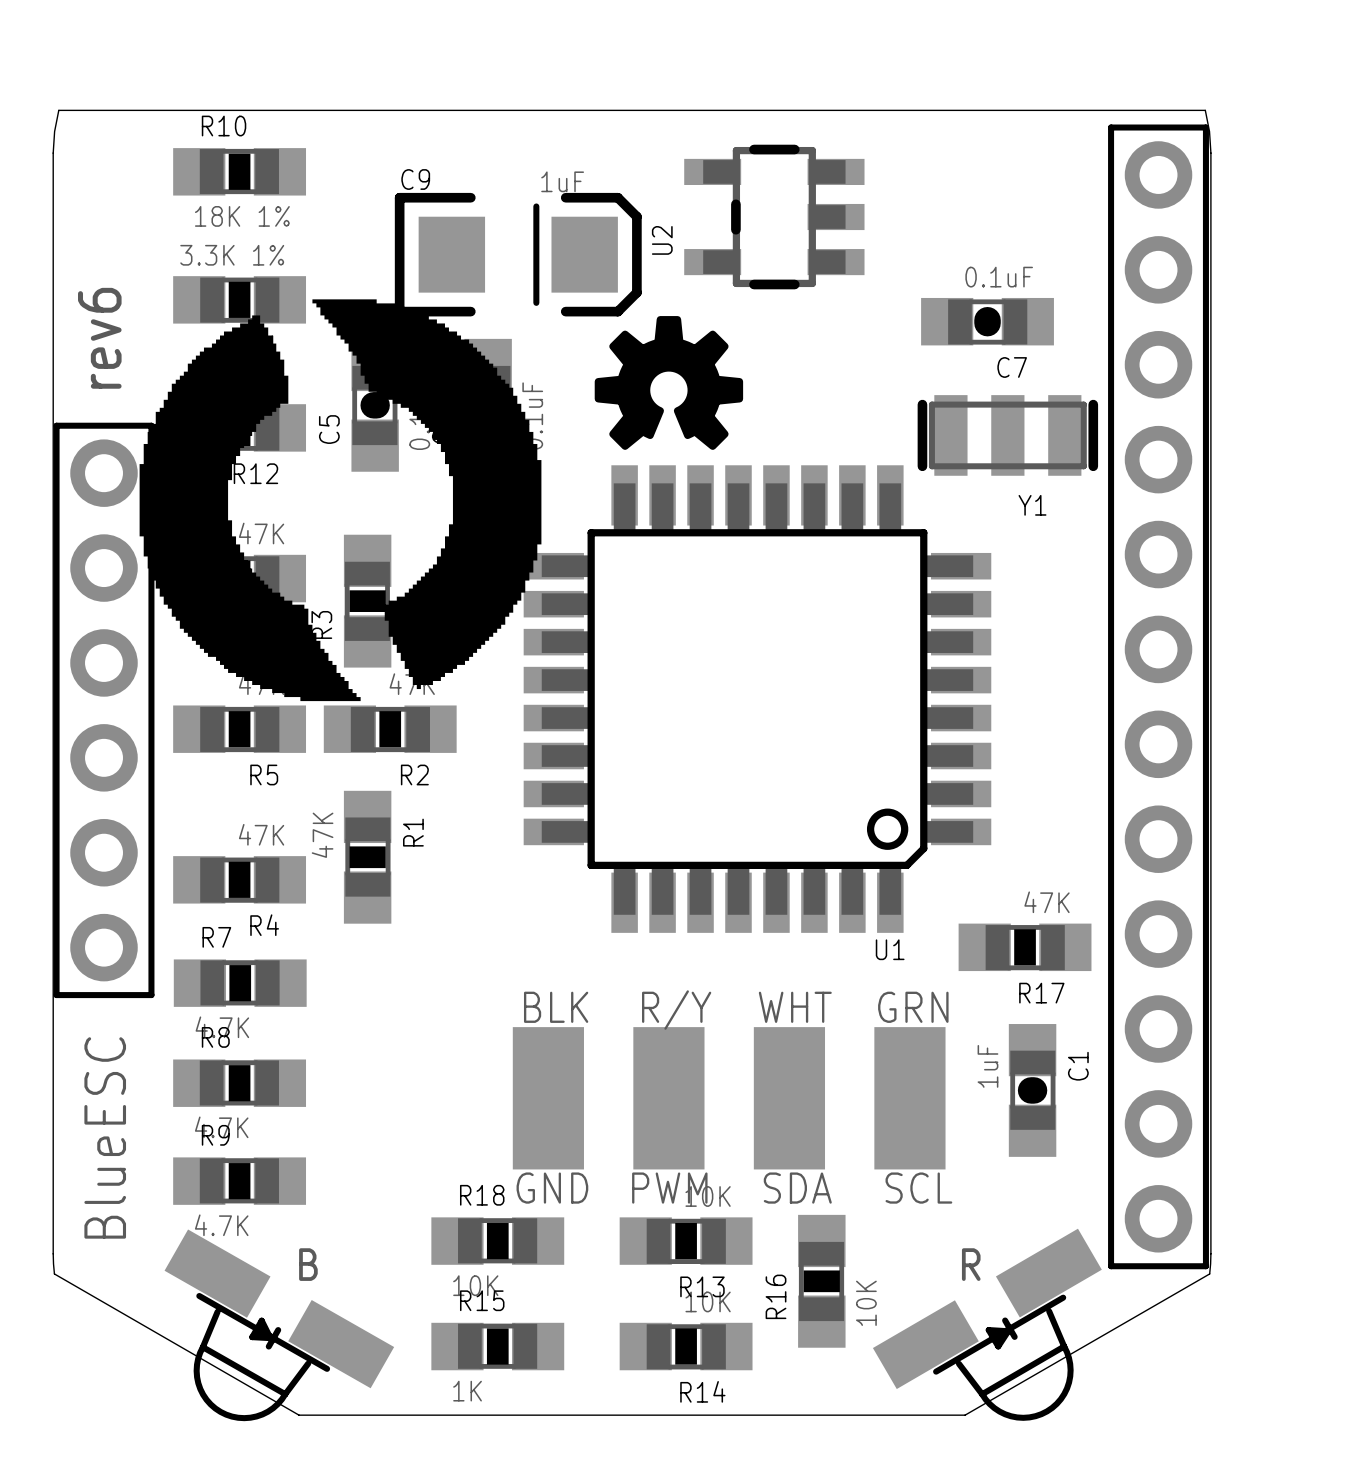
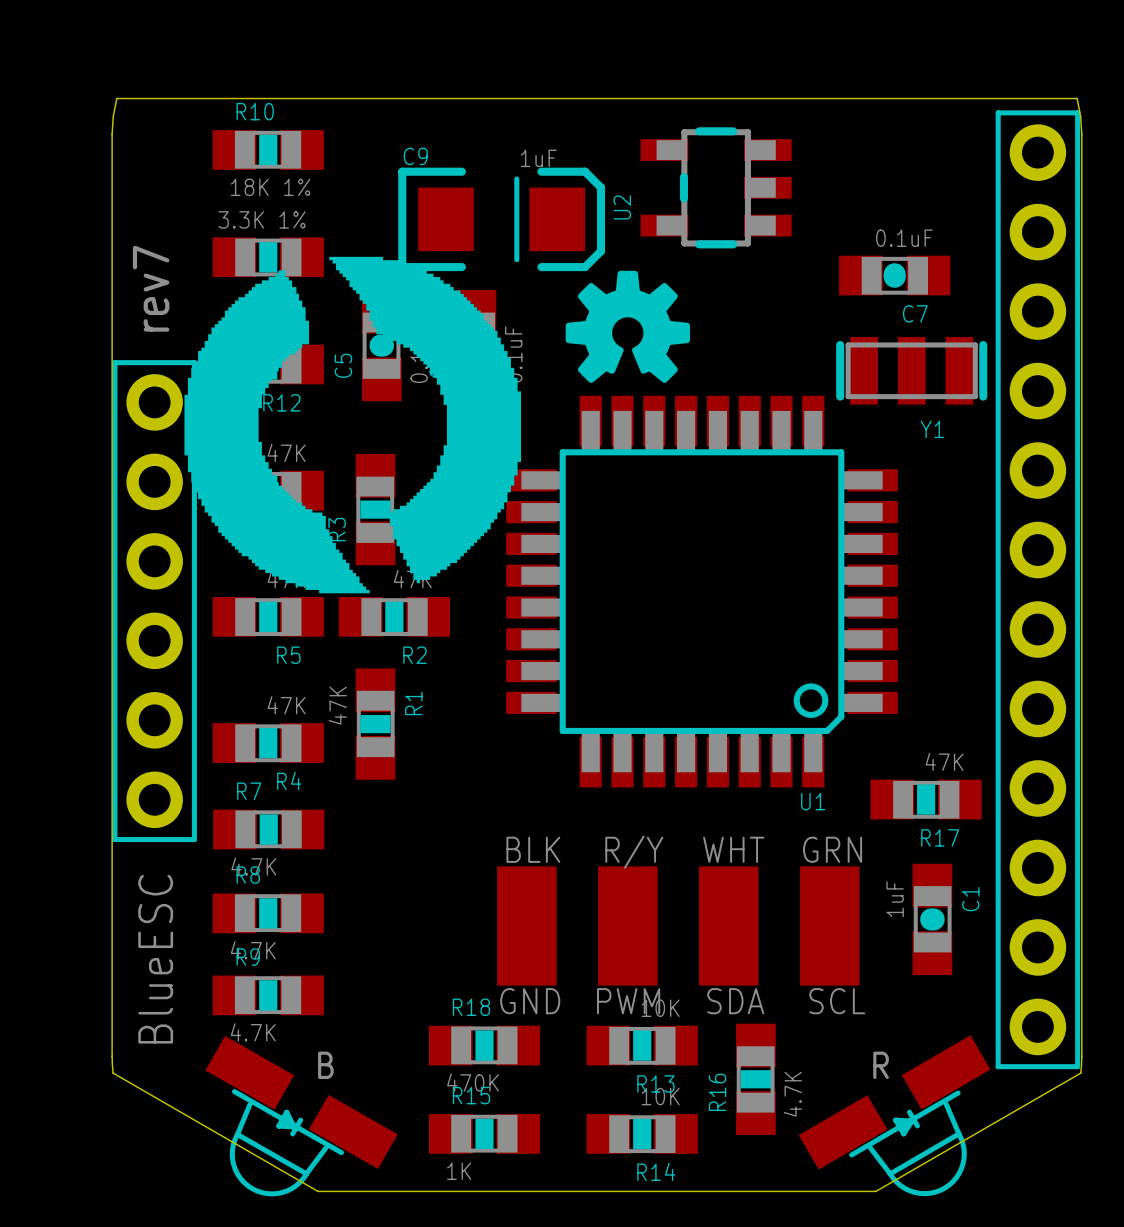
text: rev6 (99, 338) -> rev7 (151, 288)
R18 value: 10K (475, 1285) -> 470K (473, 1082)
R16 value: 10K (866, 1303) -> 4.7K (792, 1094)

